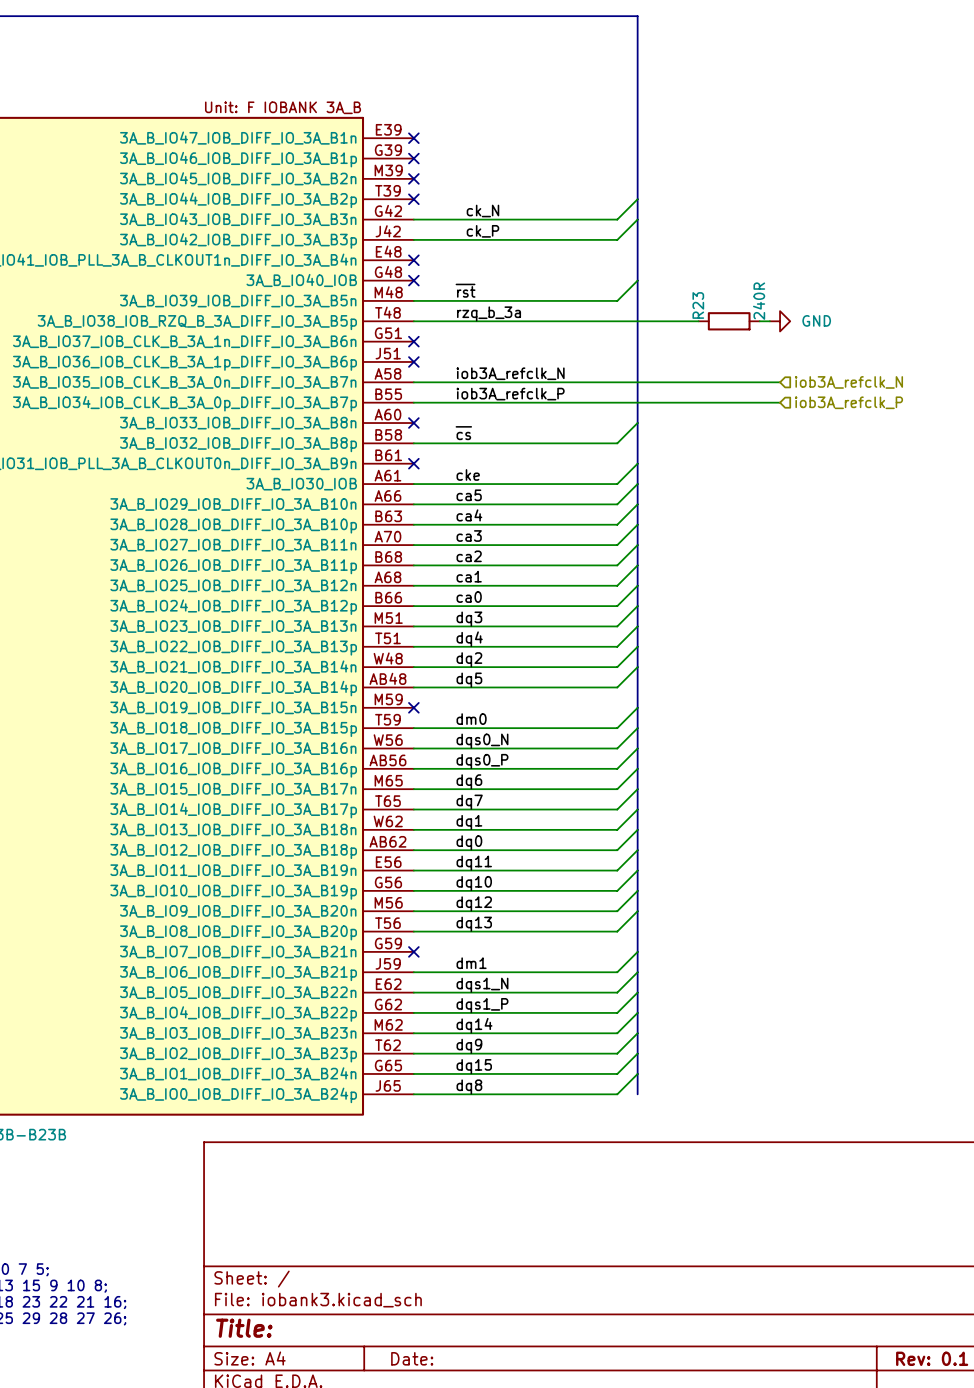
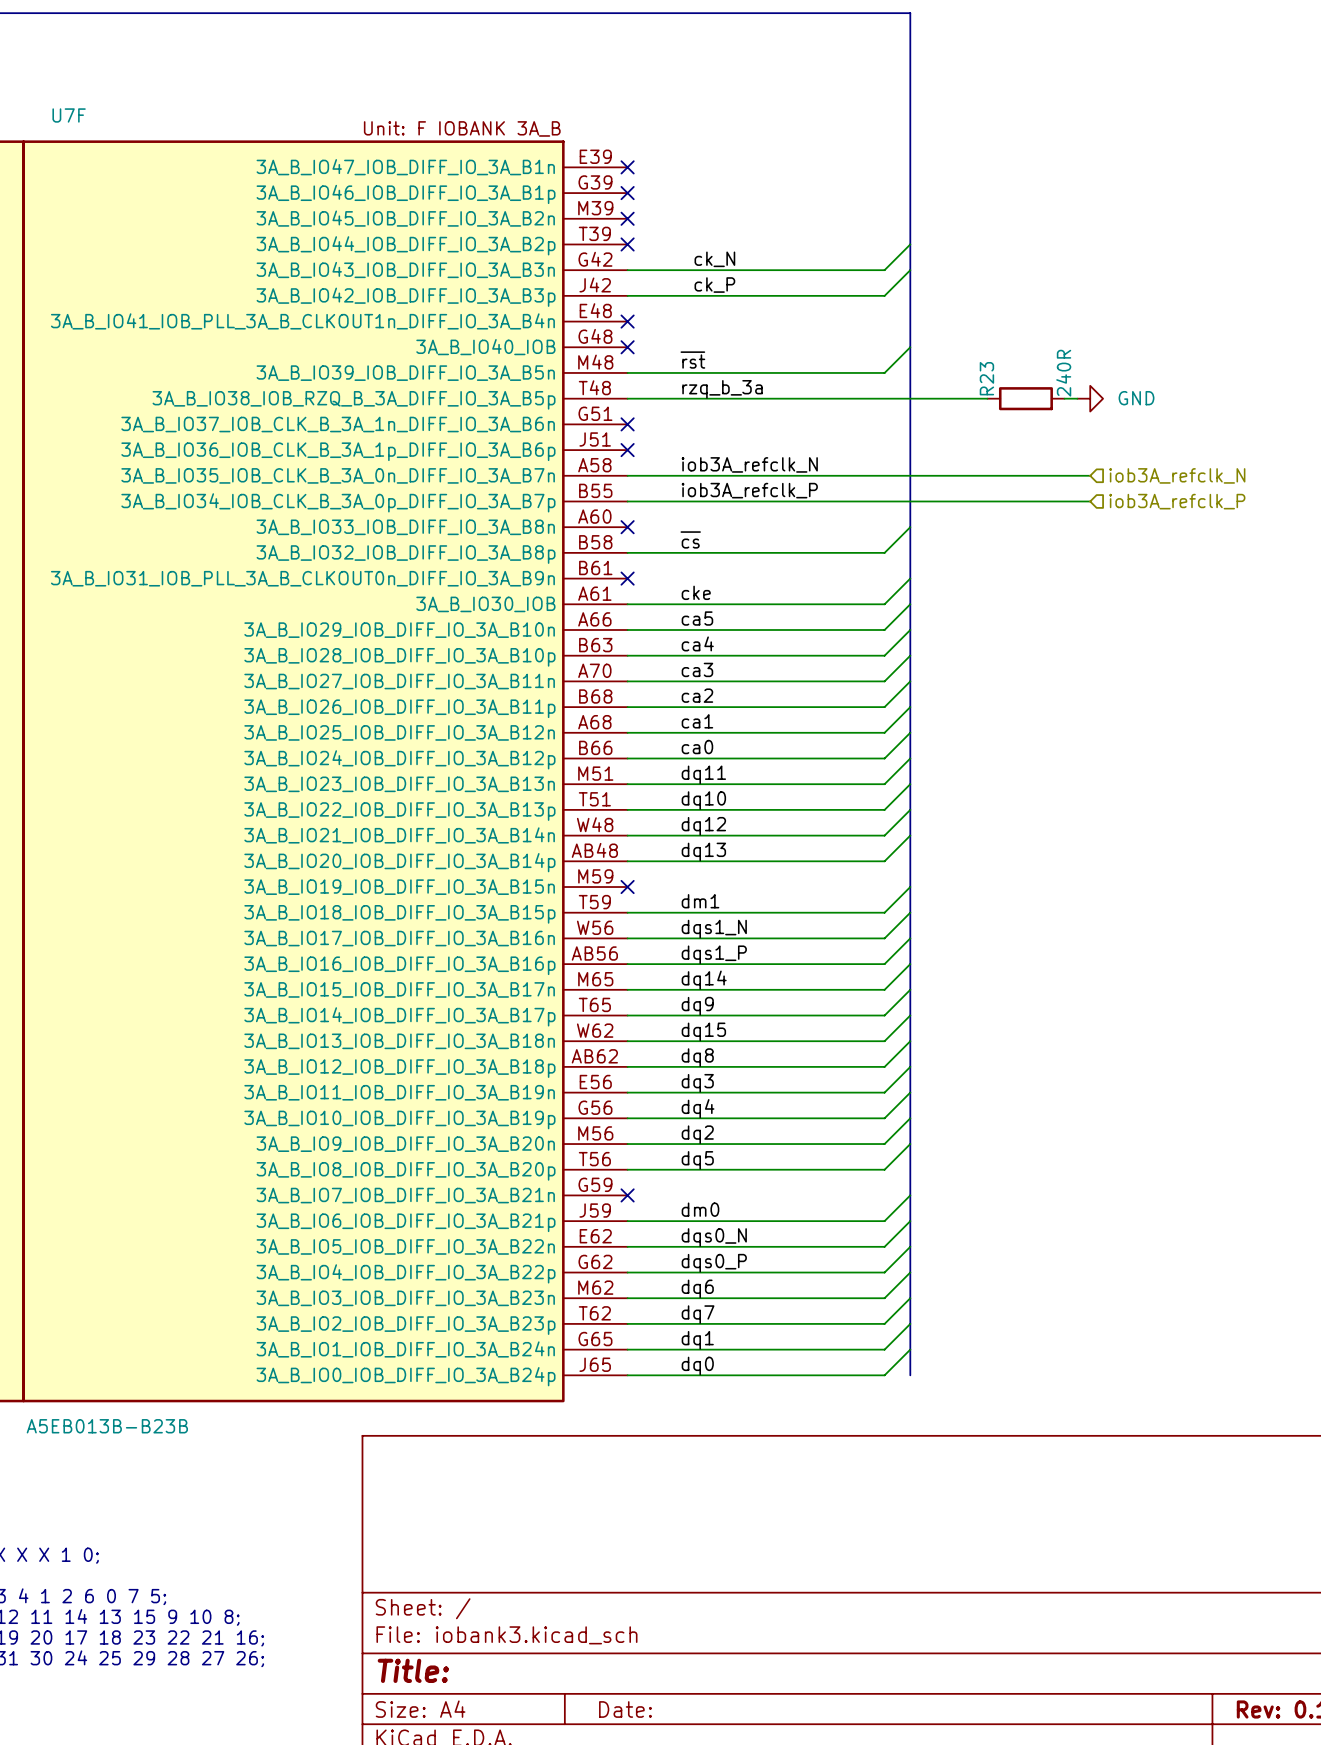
label: dq3 (469, 619) -> dq11 (703, 774)
label: dq4 (469, 639) -> dq10 (703, 800)
label: dq2 (469, 659) -> dq12 (703, 826)
label: dq5 (469, 680) -> dq13 (703, 851)
label: dm0 (471, 719) -> dm1 (700, 901)
label: dqs0_N (482, 741) -> dqs1_N (714, 929)
label: dqs0_P (482, 761) -> dqs1_P (714, 954)
label: dq6 (469, 781) -> dq14 (704, 980)
label: dq7 (469, 802) -> dq9 (697, 1006)
label: dq1 (469, 822) -> dq15 (703, 1031)
label: dq0 (469, 842) -> dq8 (697, 1057)
label: dq11 (474, 863) -> dq3 (697, 1083)
label: dq10 (474, 883) -> dq4 (698, 1108)
label: dq12 (474, 903) -> dq2 (697, 1134)
label: dq13 (474, 924) -> dq5 (697, 1160)
label: dm1 (471, 963) -> dm0 (700, 1209)
label: dqs1_N (482, 985) -> dqs0_N (714, 1237)
label: dqs1_P (482, 1005) -> dqs0_P (714, 1263)
label: dq14 (474, 1025) -> dq6 (697, 1288)
label: dq9 (469, 1046) -> dq7 (698, 1314)
label: dq15 (474, 1066) -> dq1 (697, 1340)
label: dq8 (469, 1086) -> dq0 (697, 1366)

